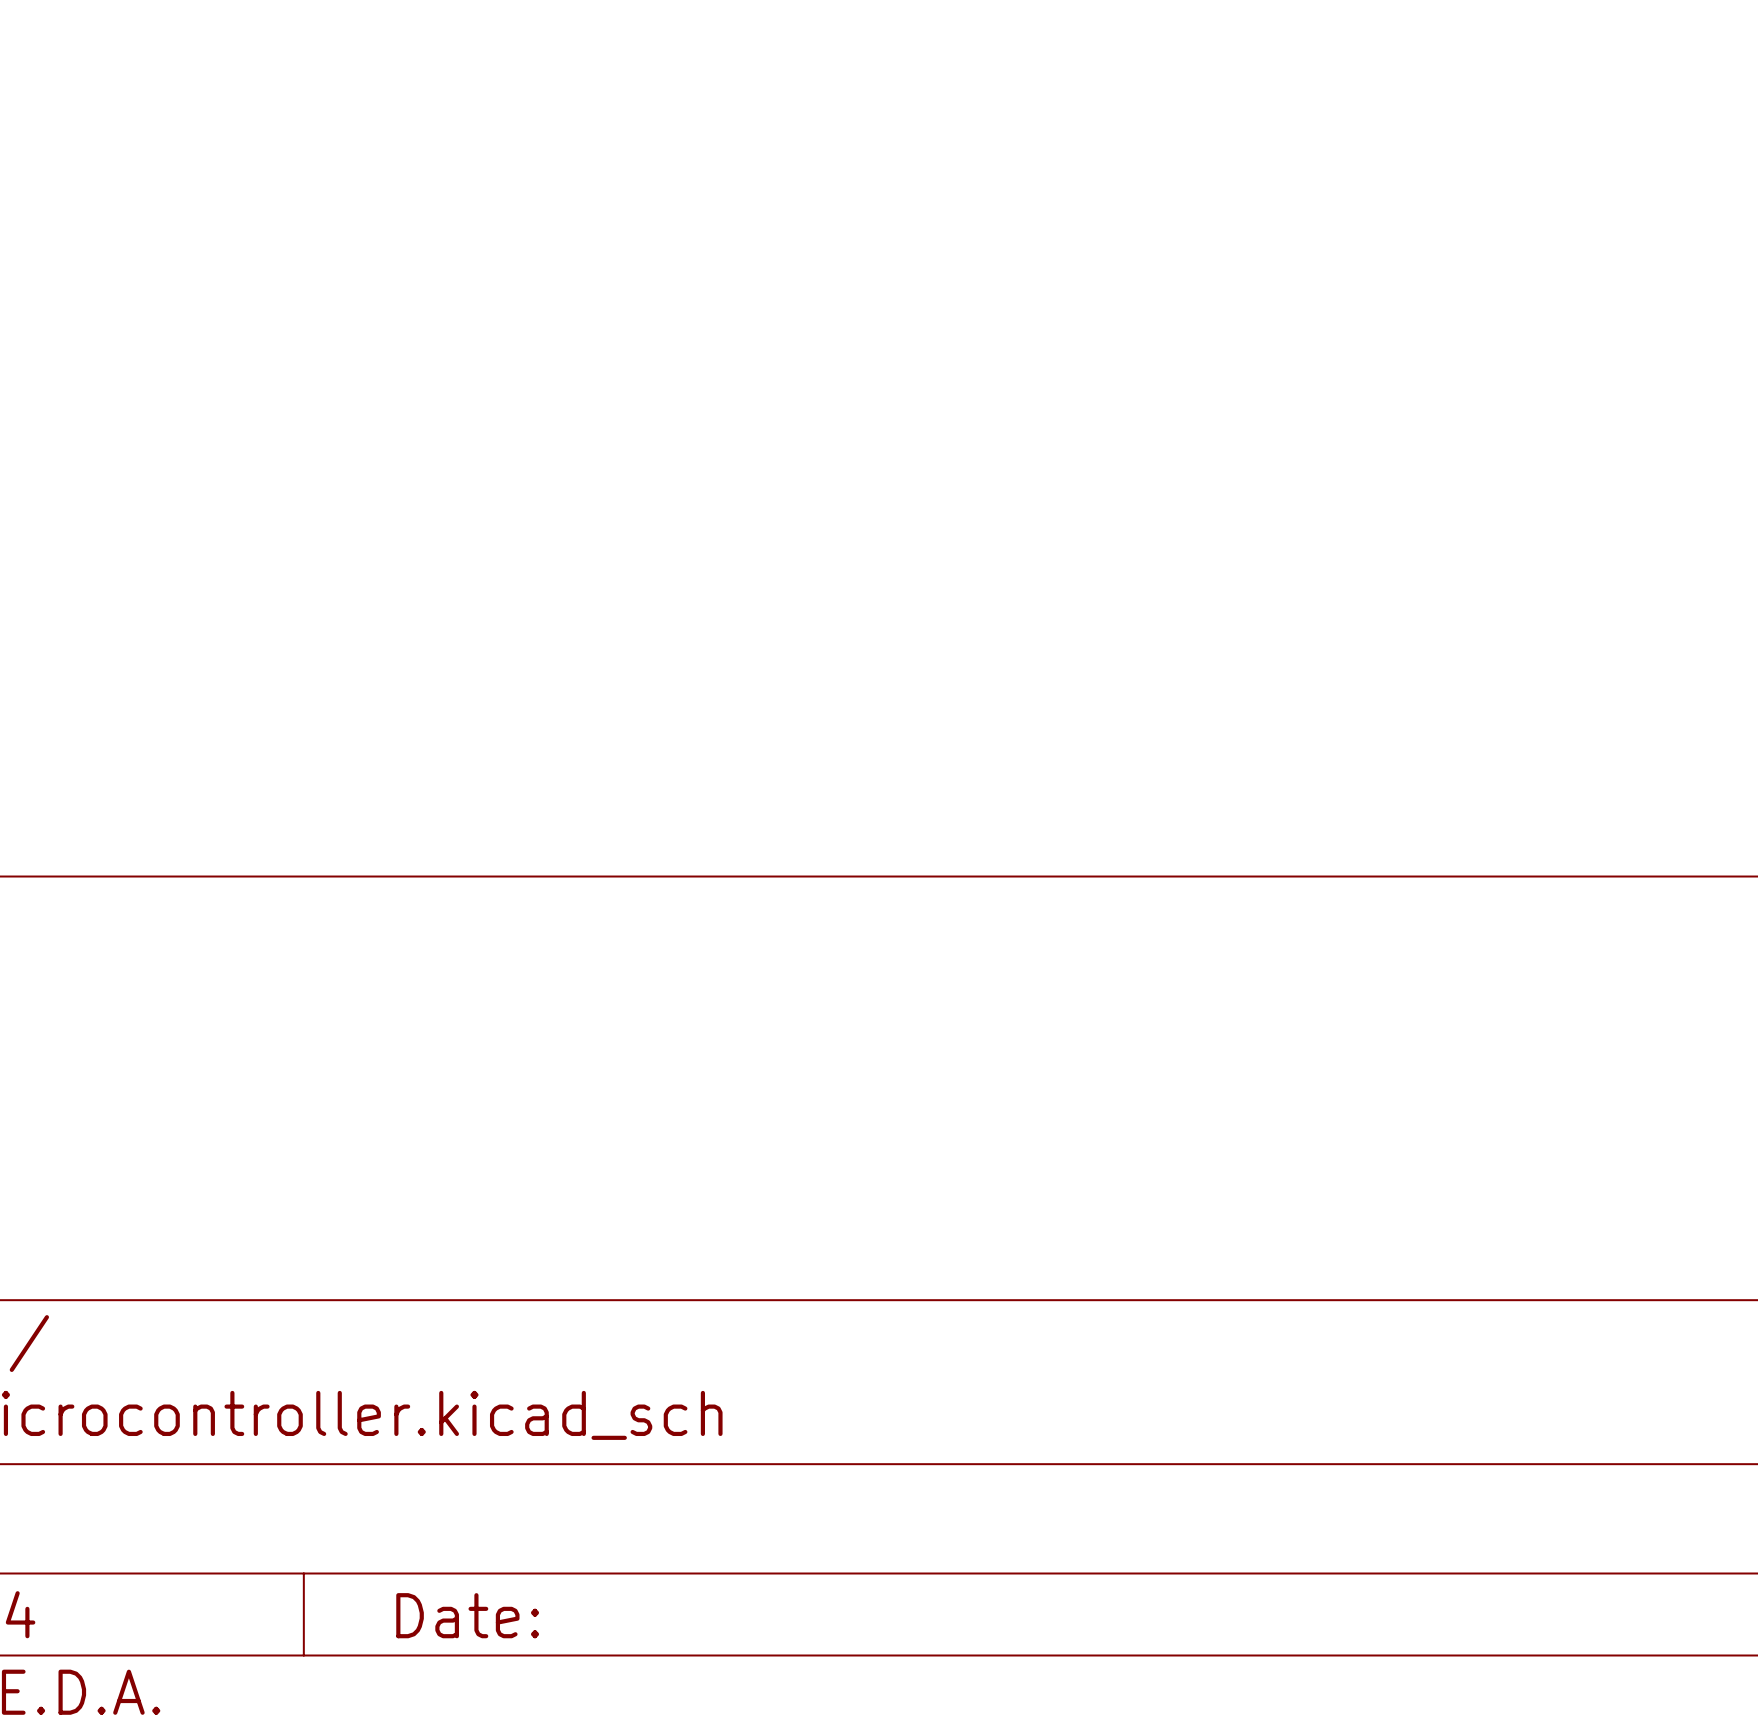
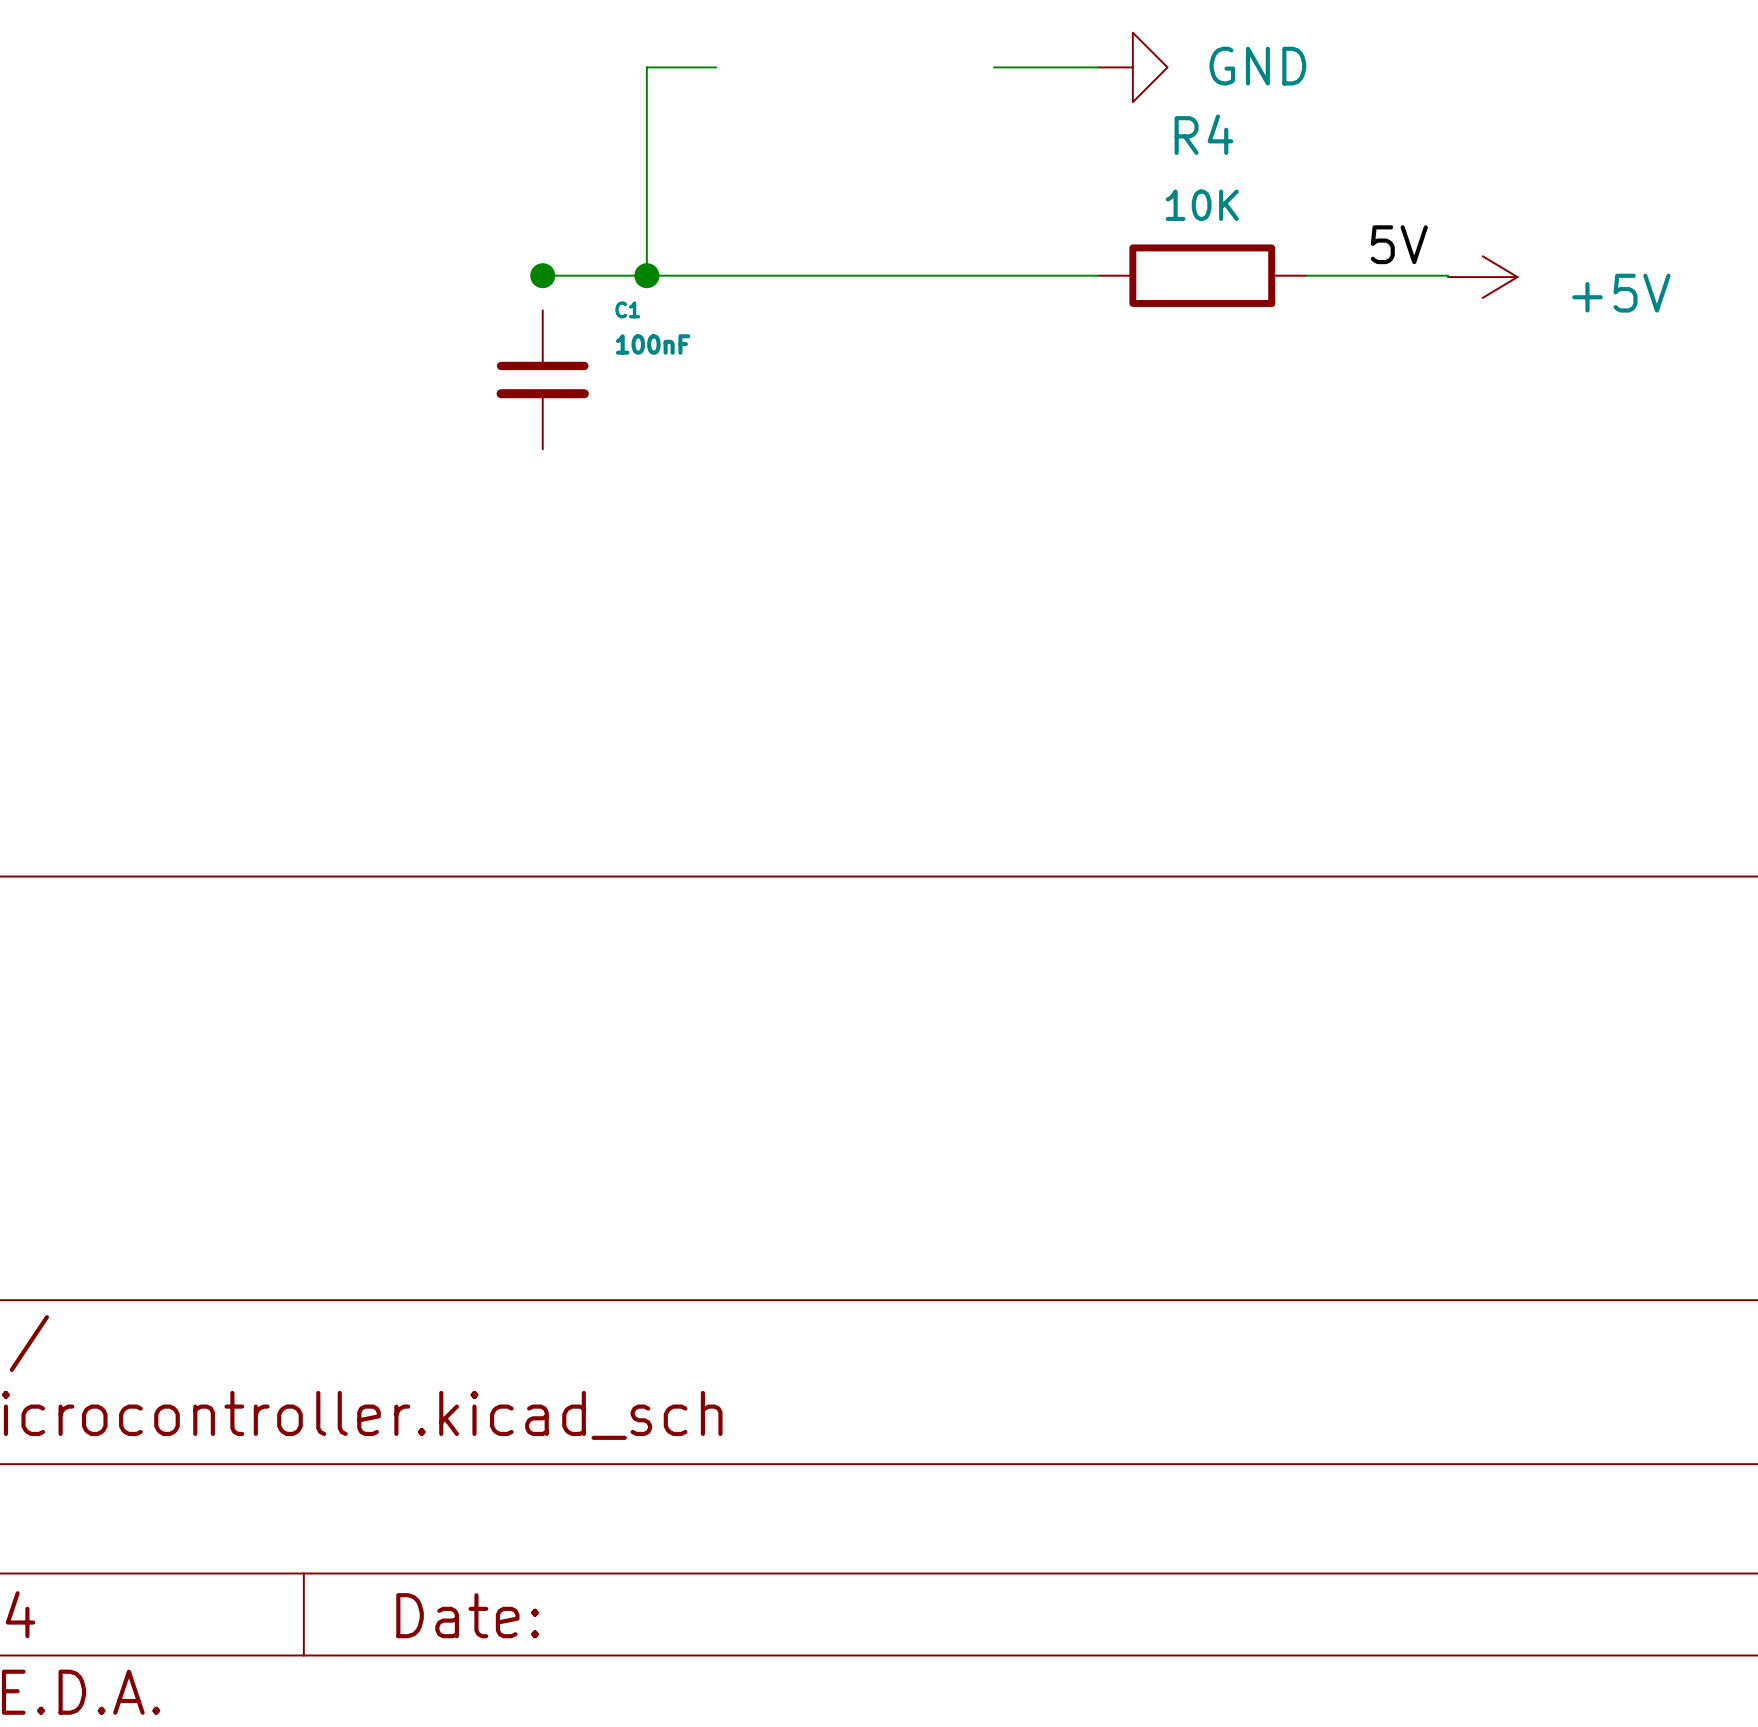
wire: none -> (716, 67) (646, 67) (646, 275)
wire: none -> (993, 67) (1098, 67)
power symbol: none -> GND (1132, 67)
label: none -> 5V (1399, 244)
wire: none -> (542, 275) (1098, 275)
junction: none -> (542, 275)
junction: none -> (646, 275)
R4: none -> 10K (1202, 275)
wire: none -> (1306, 275) (1448, 277)
power symbol: none -> +5V (1482, 277)
C1: none -> 100nF (542, 379)

